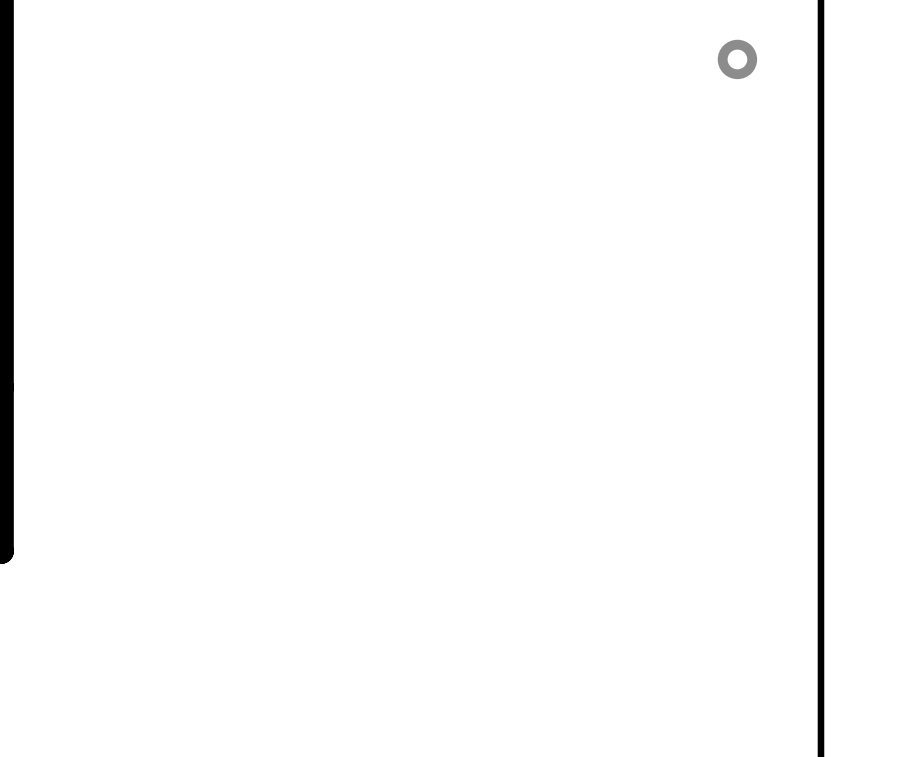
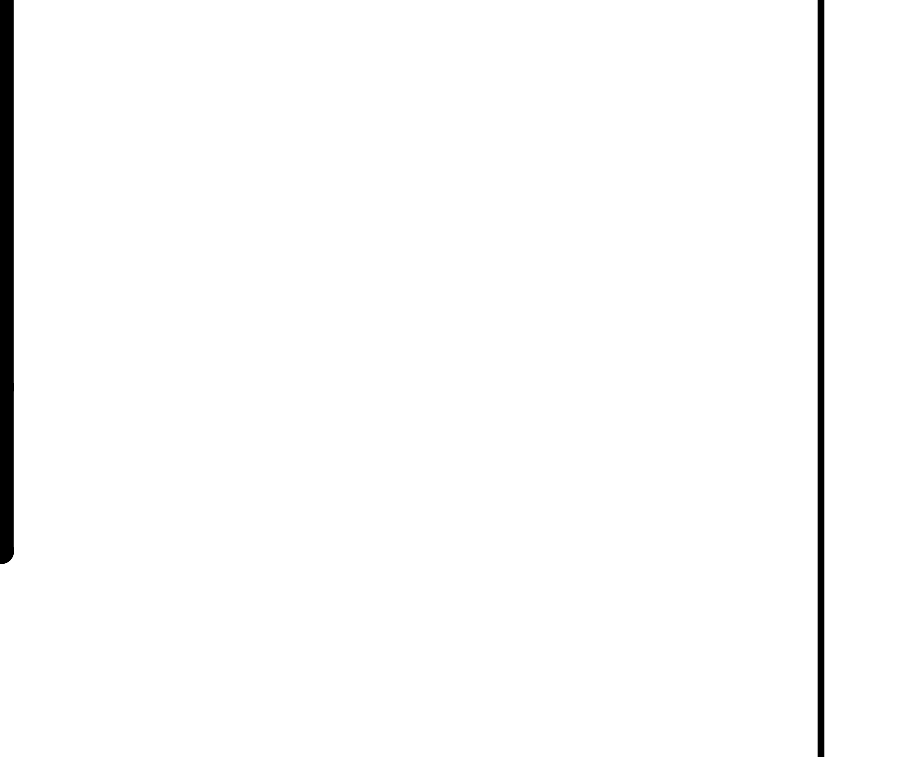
via: (737, 59) -> none

